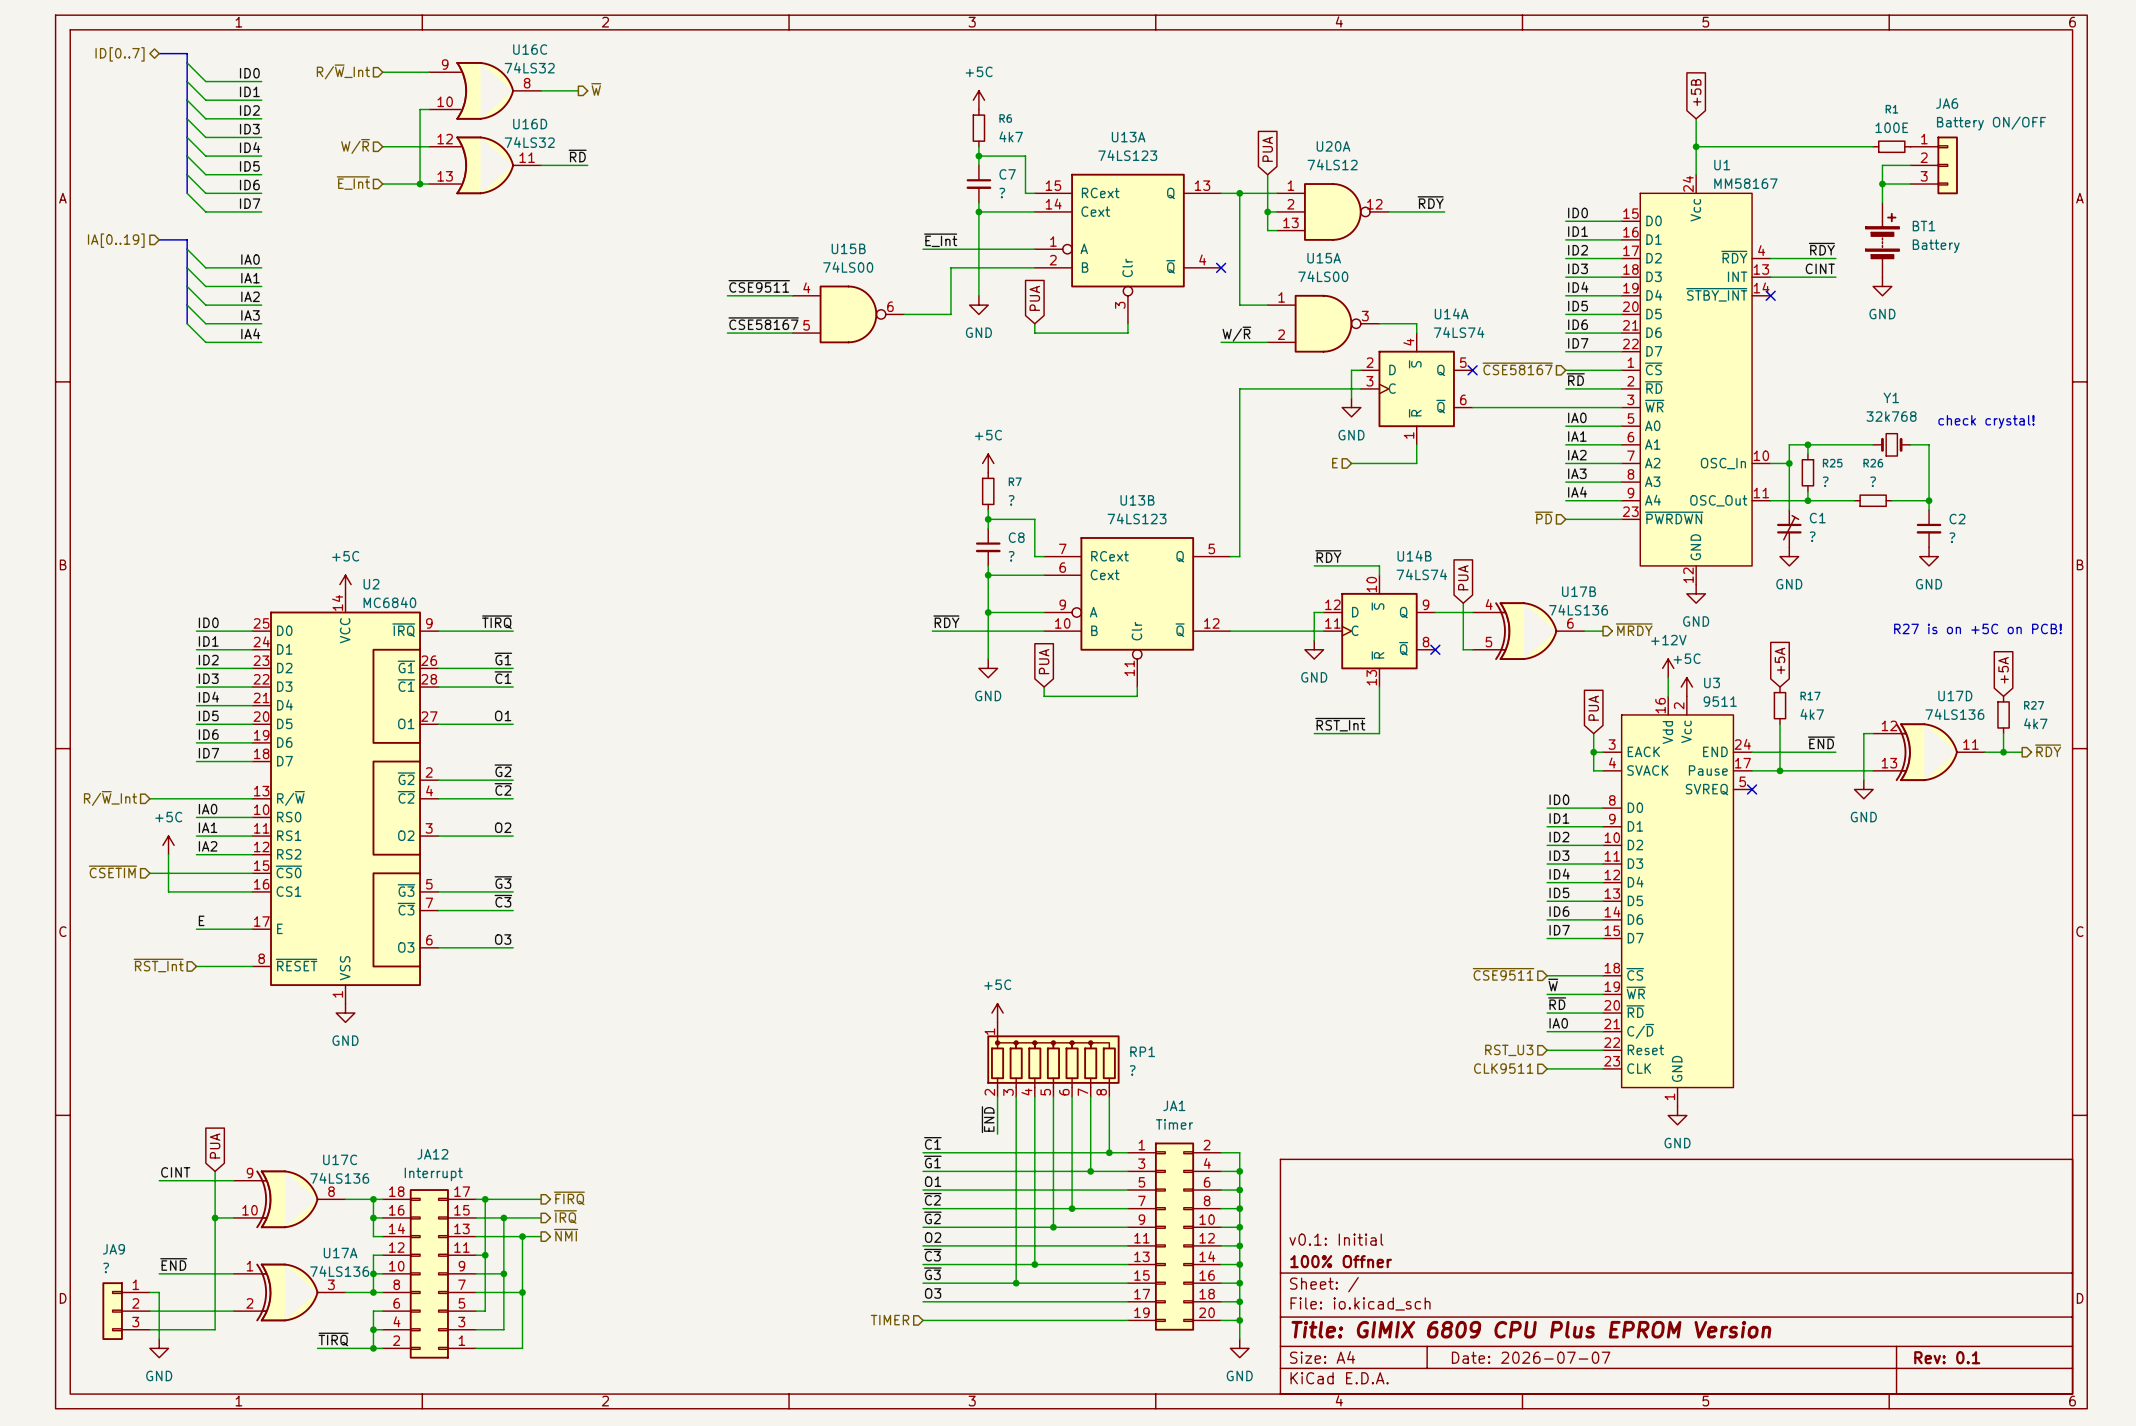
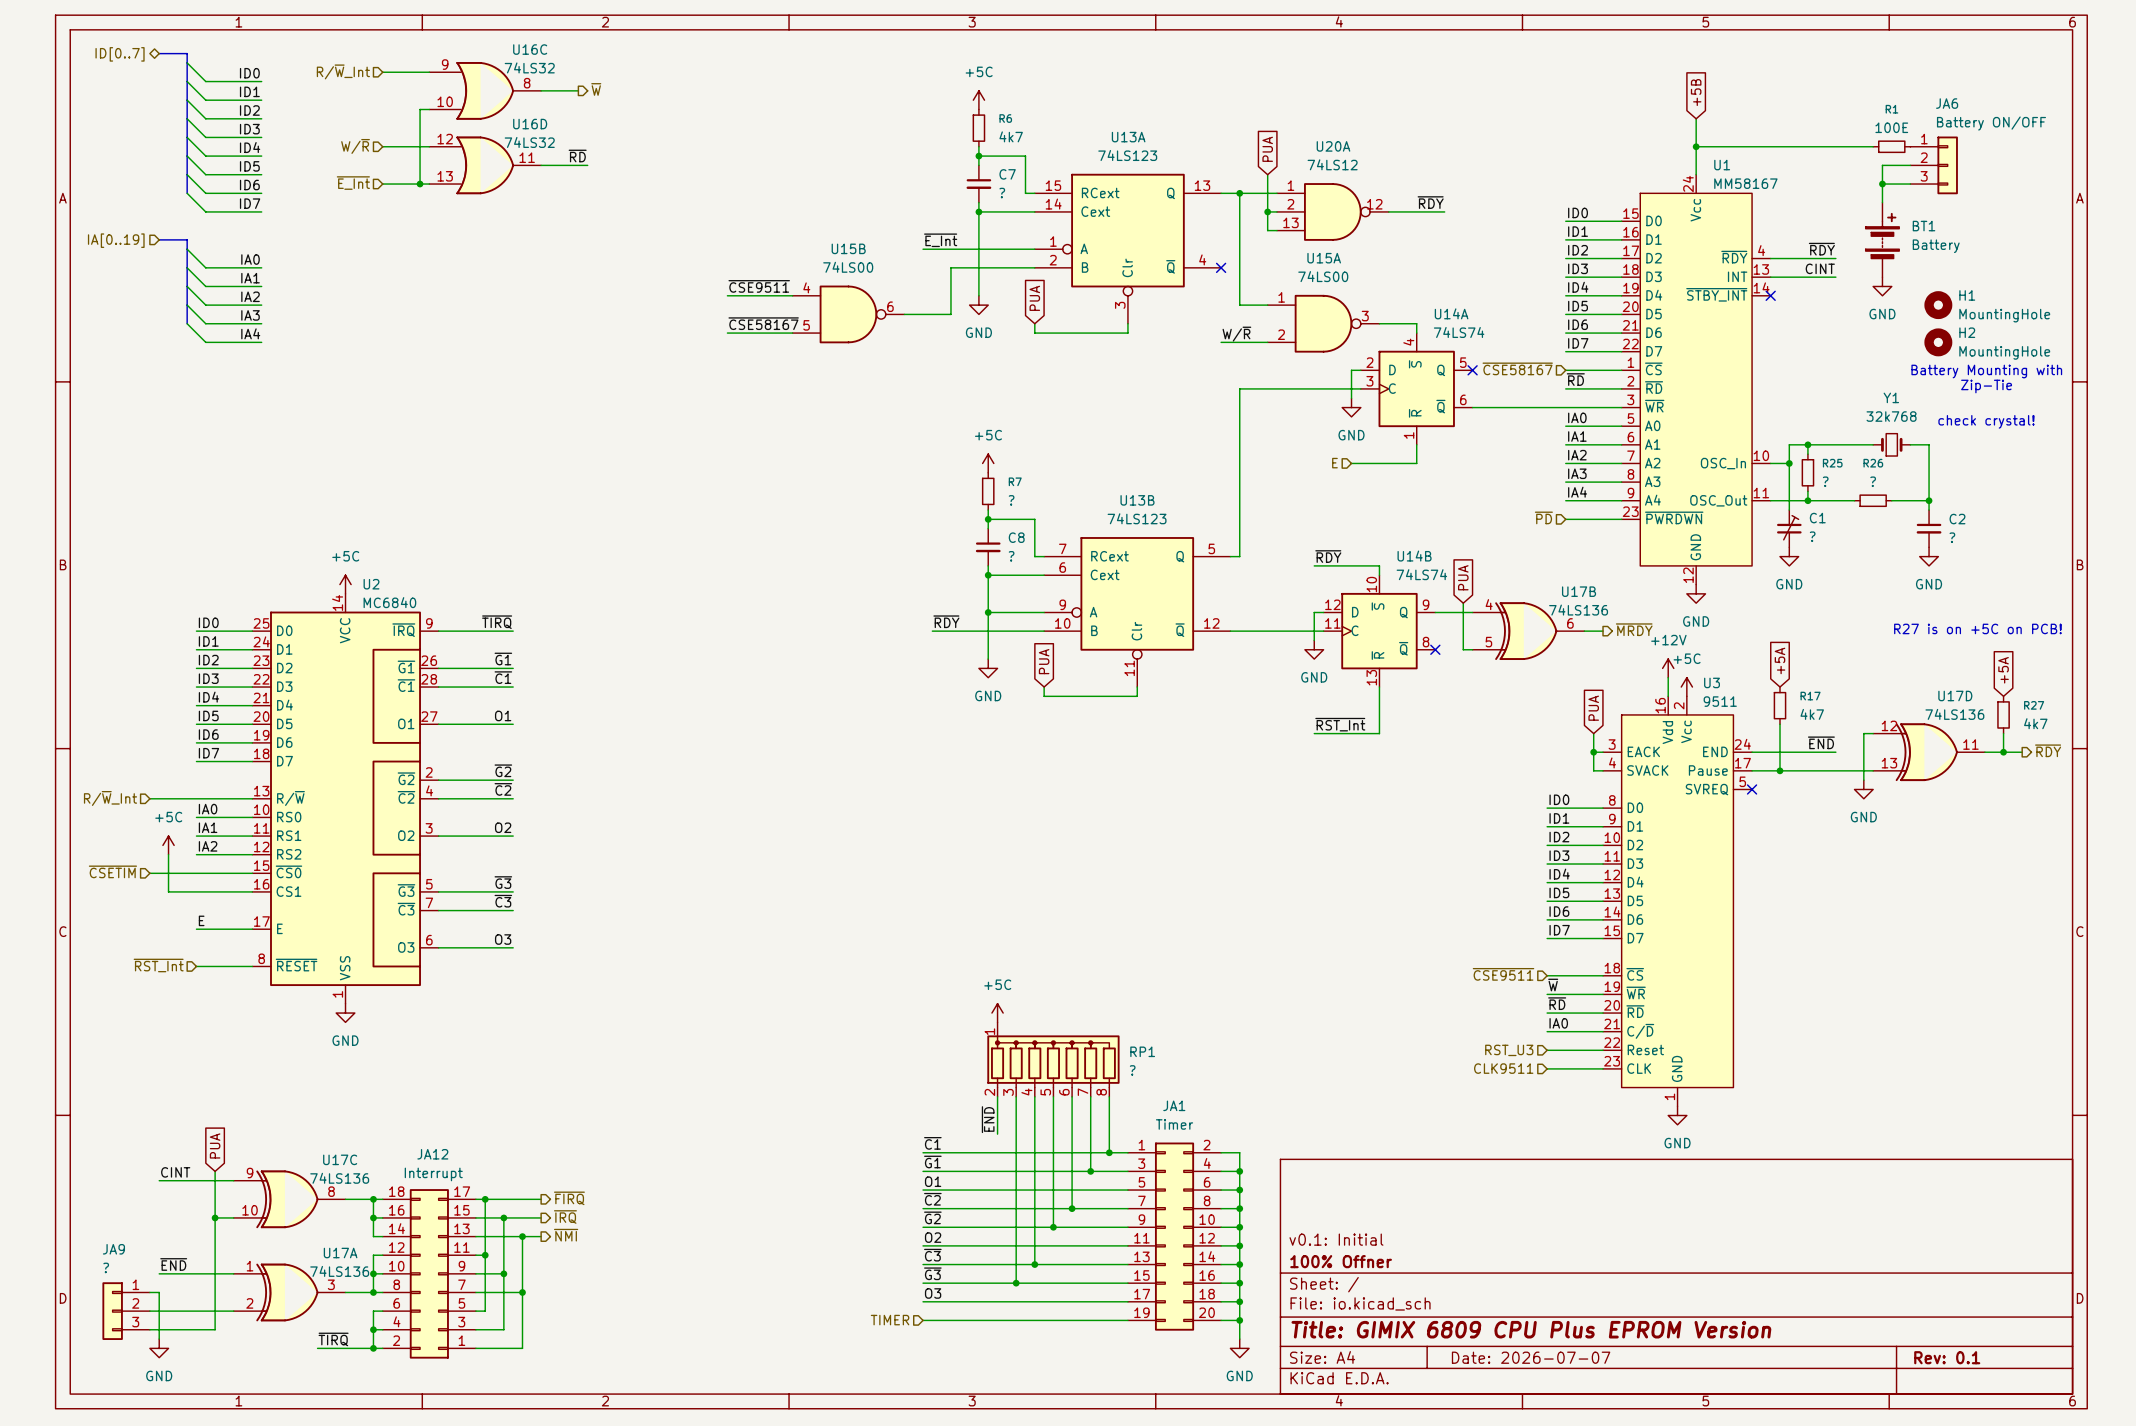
H1: none -> MountingHole (1938, 305)
H2: none -> MountingHole (1938, 342)
text: none -> Battery Mounting with (1986, 371)
text: none -> Zip-Tie (1986, 386)

